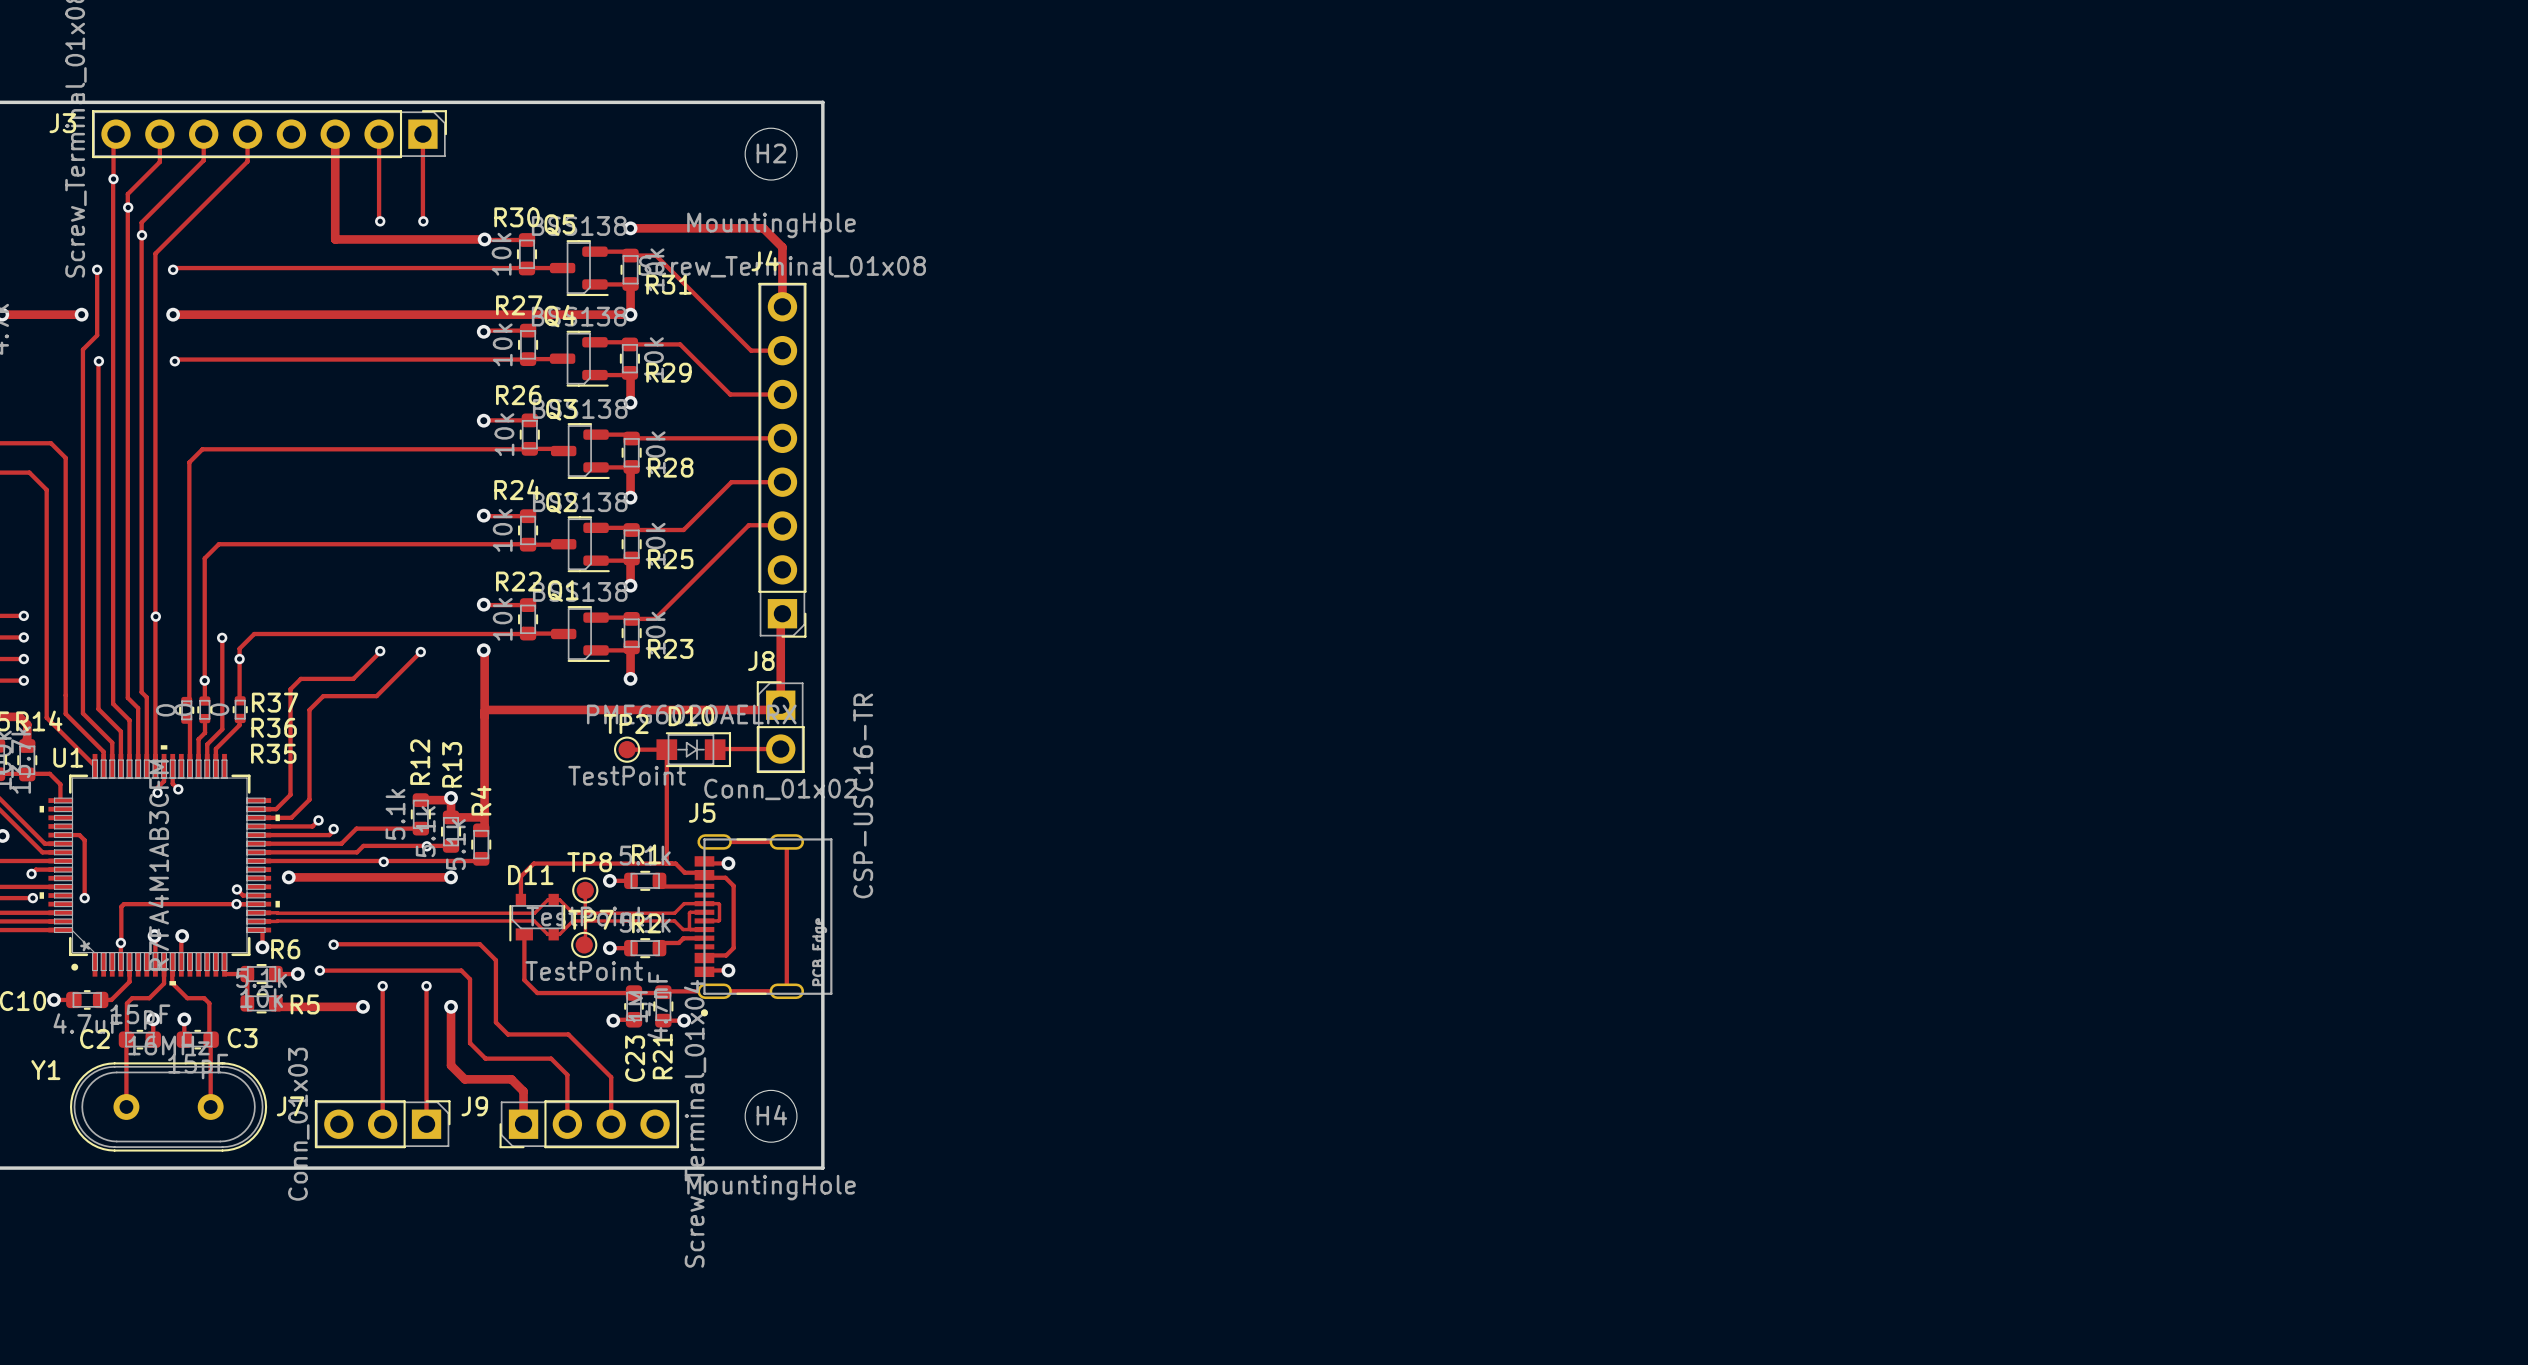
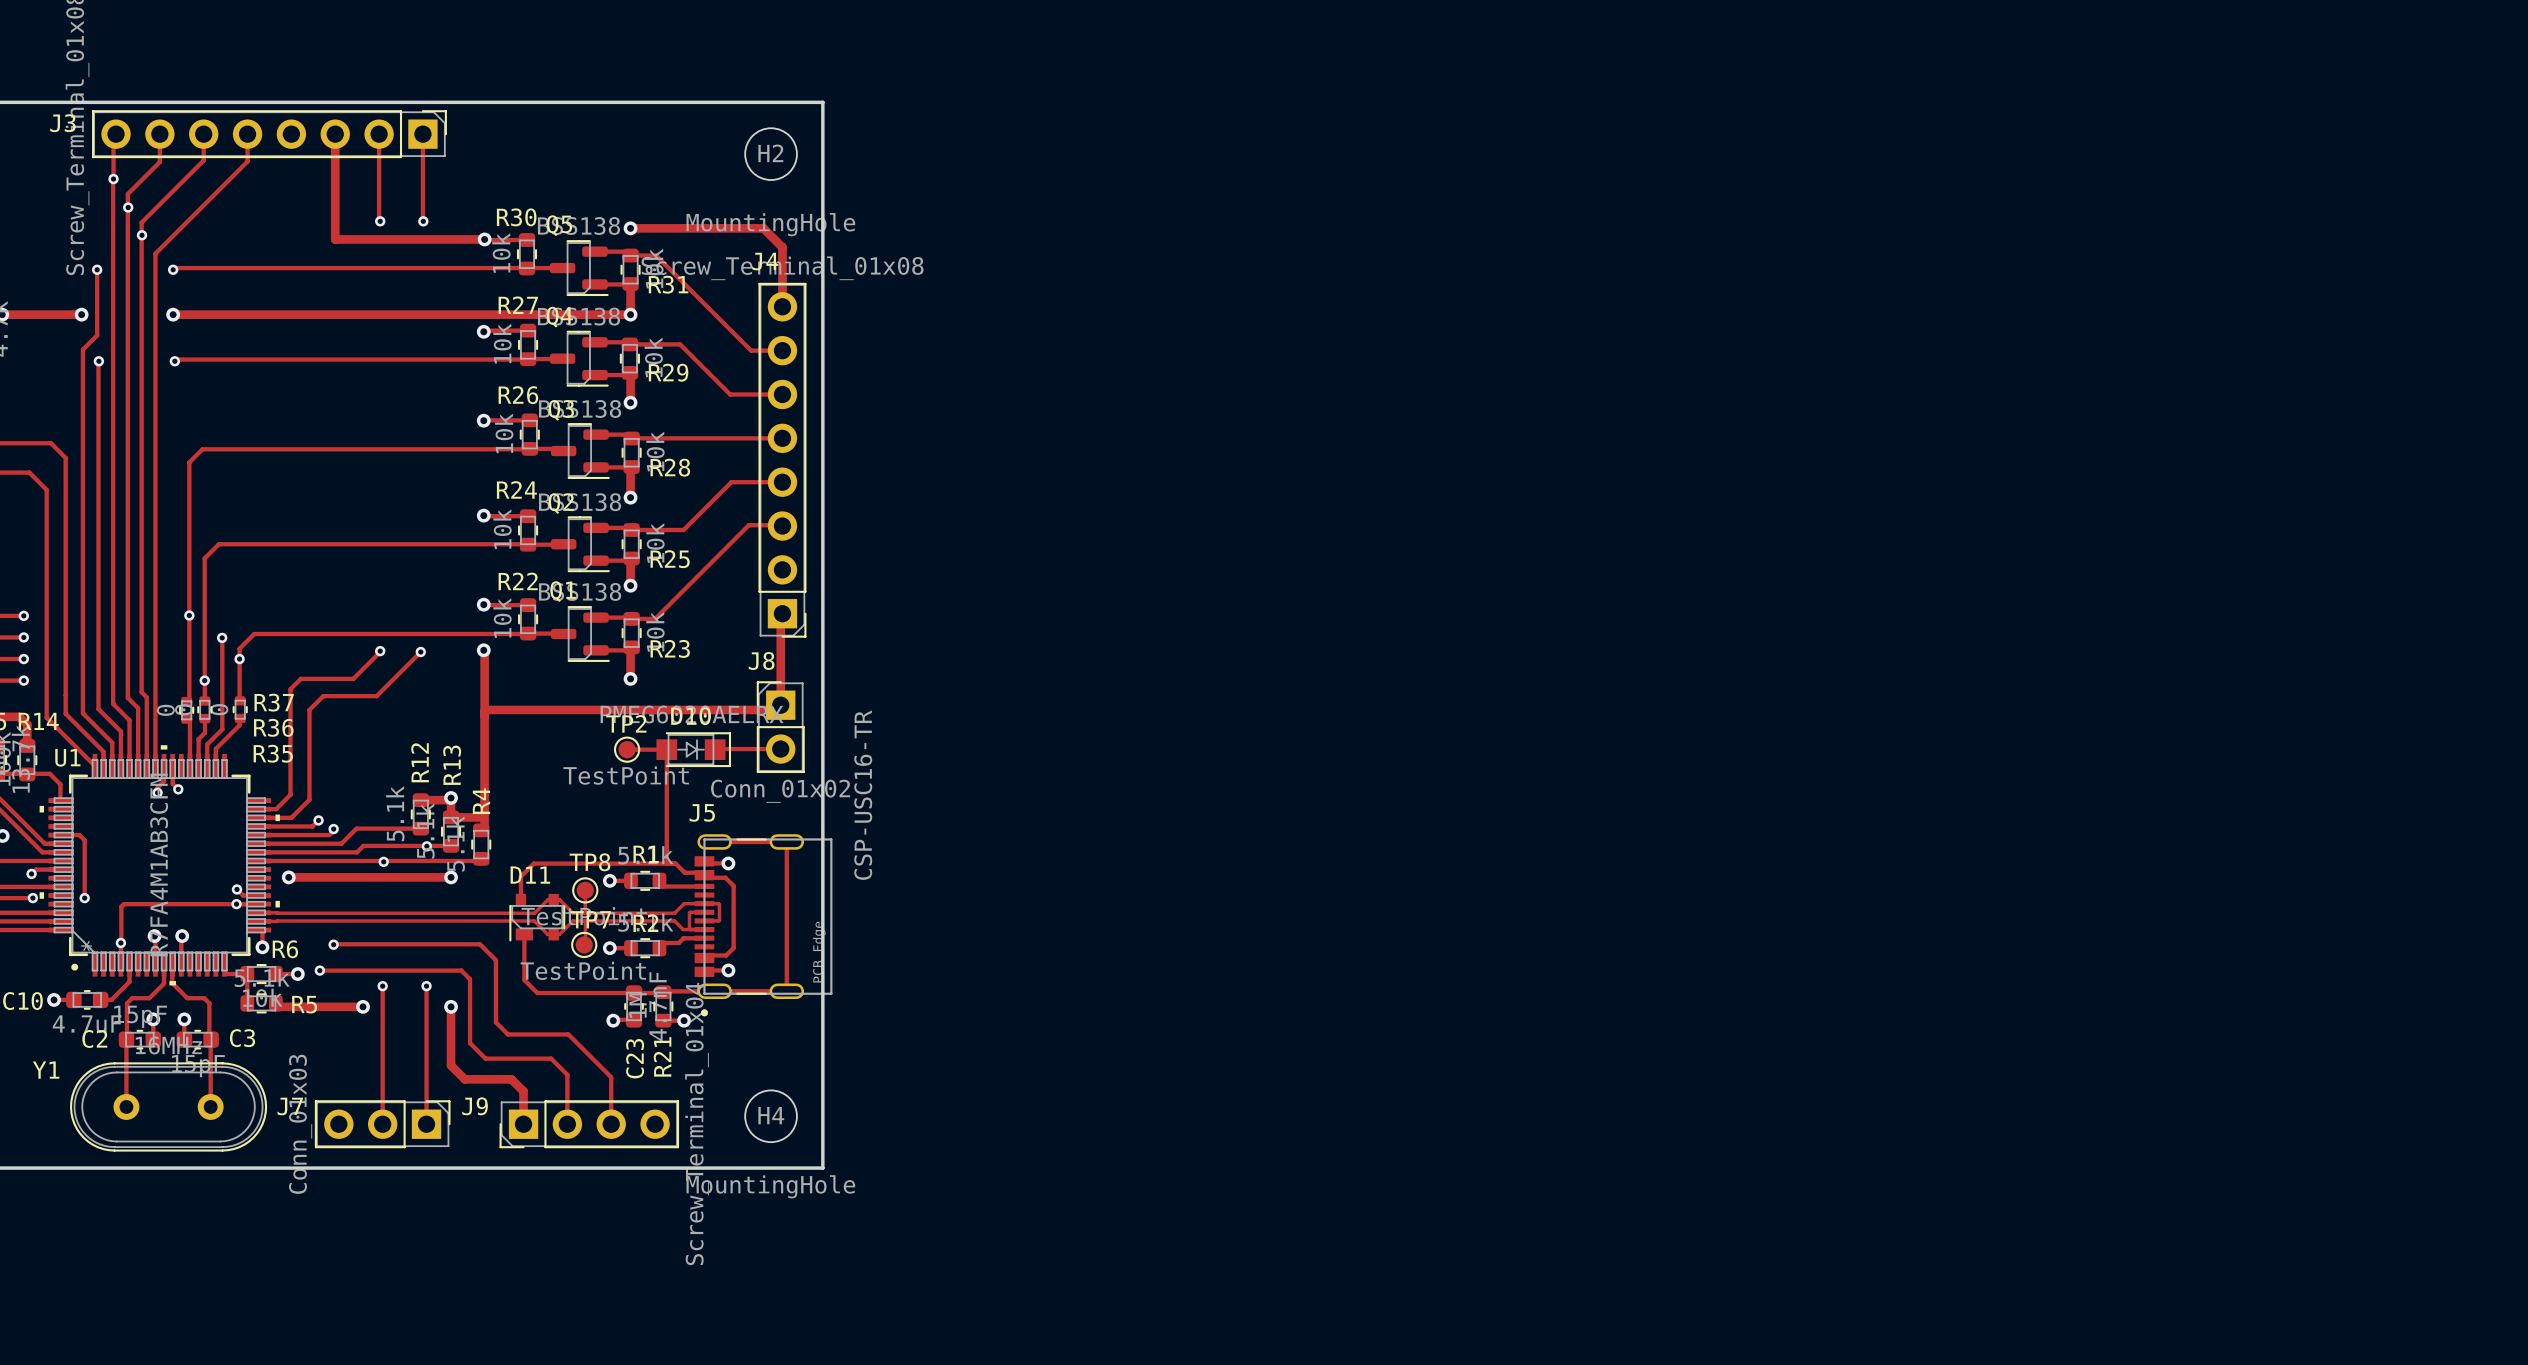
via position: (155, 616) -> (189, 615)

